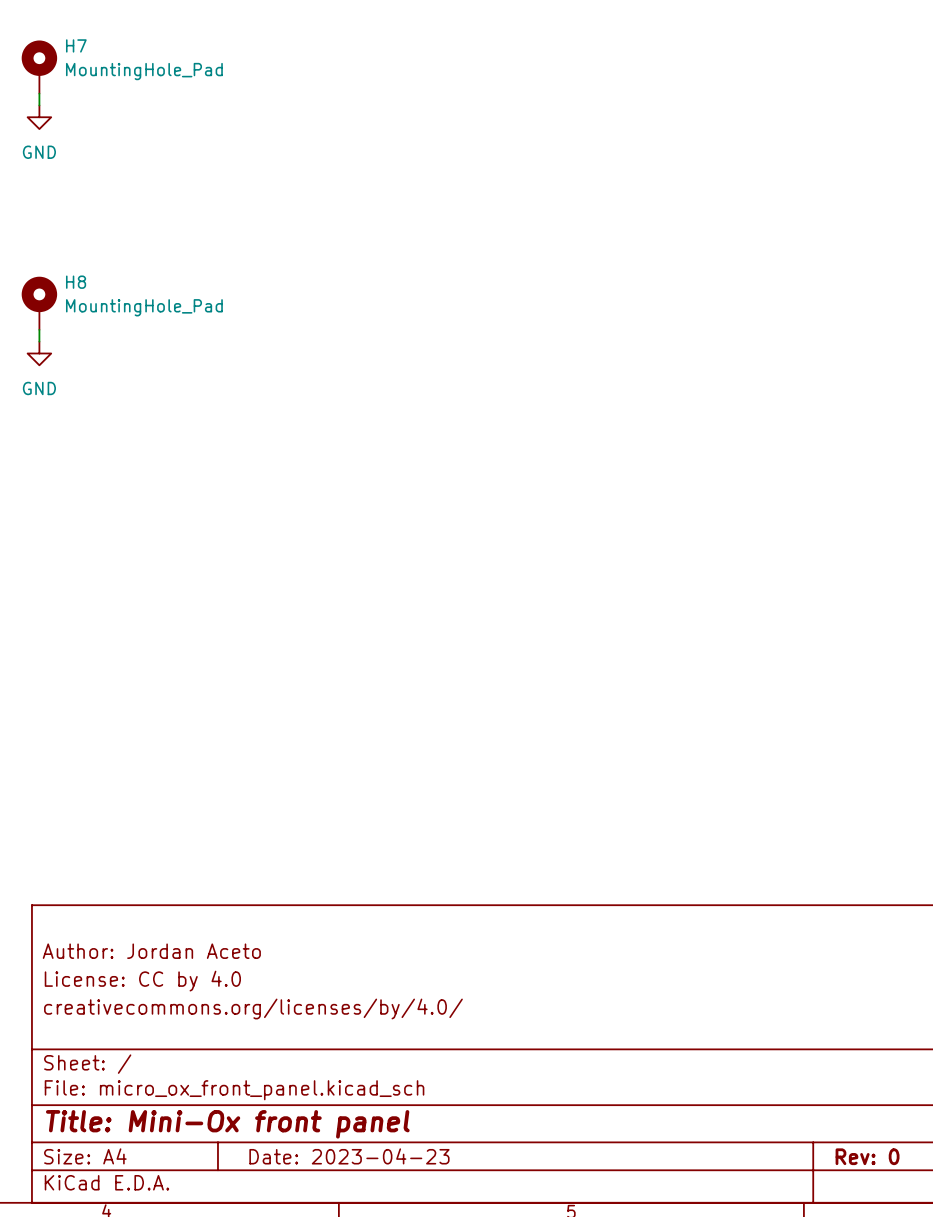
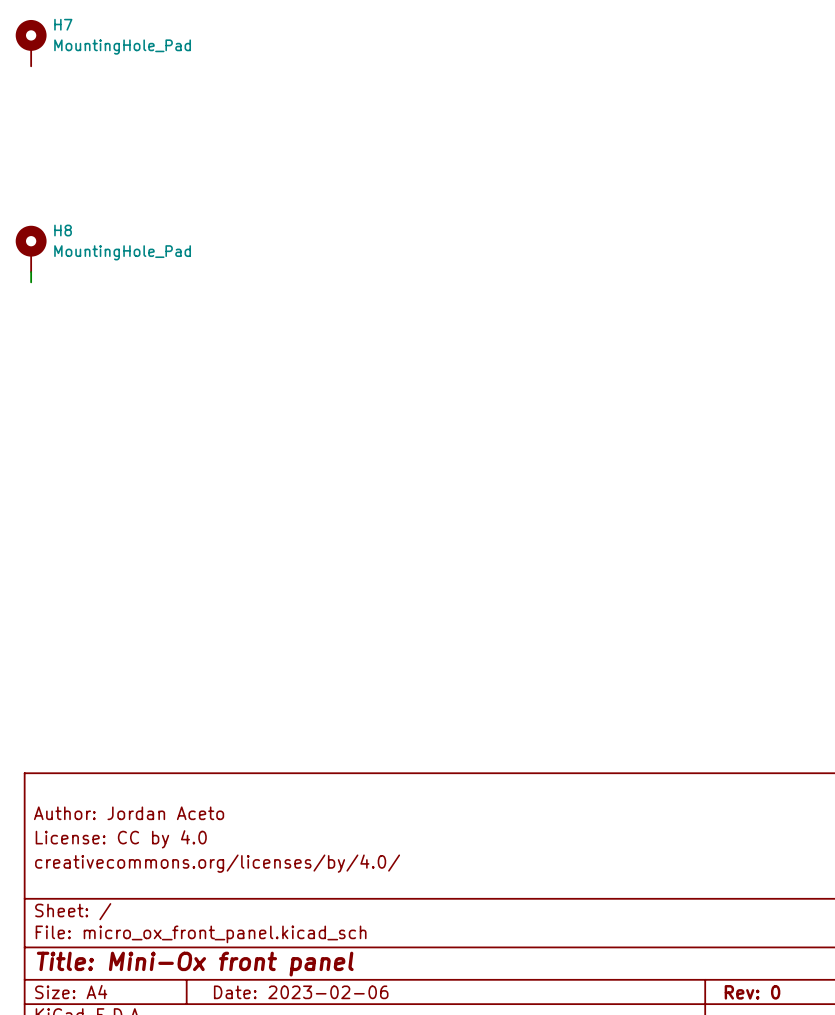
wire: (39, 93) (39, 105) -> none
power symbol: GND (39, 117) -> none
power symbol: GND (39, 353) -> none
title block: Date: 2023-04-23 (349, 1156) -> Date: 2023-02-06 (301, 992)

